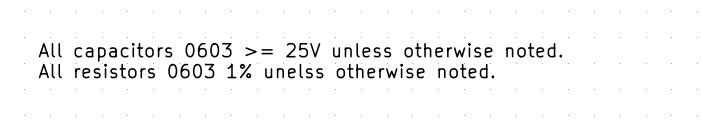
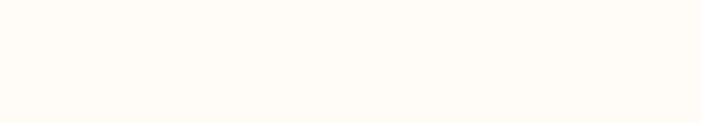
text: All capacitors 0603 >= 25V unless otherwise noted. (300, 52) -> none
text: All resistors 0603 1% unelss otherwise noted. (266, 71) -> none

